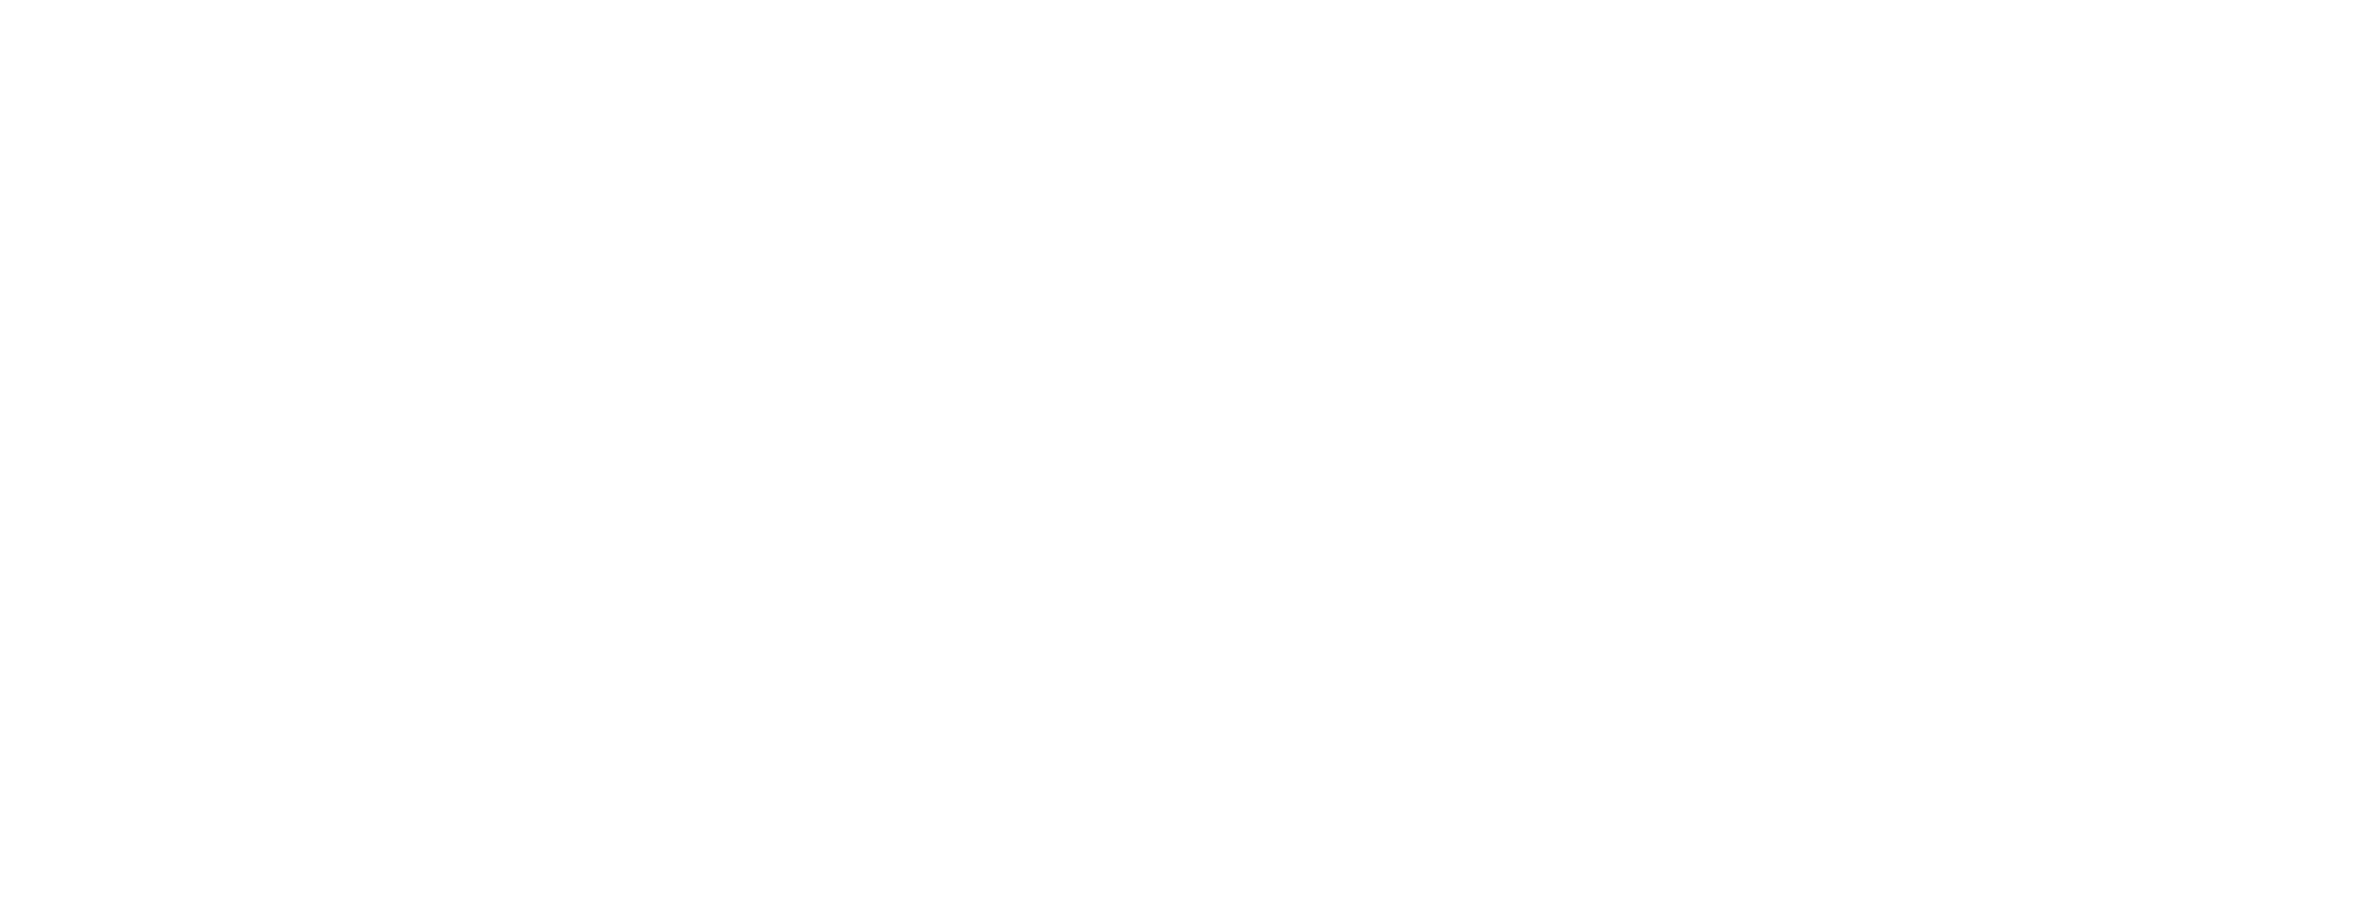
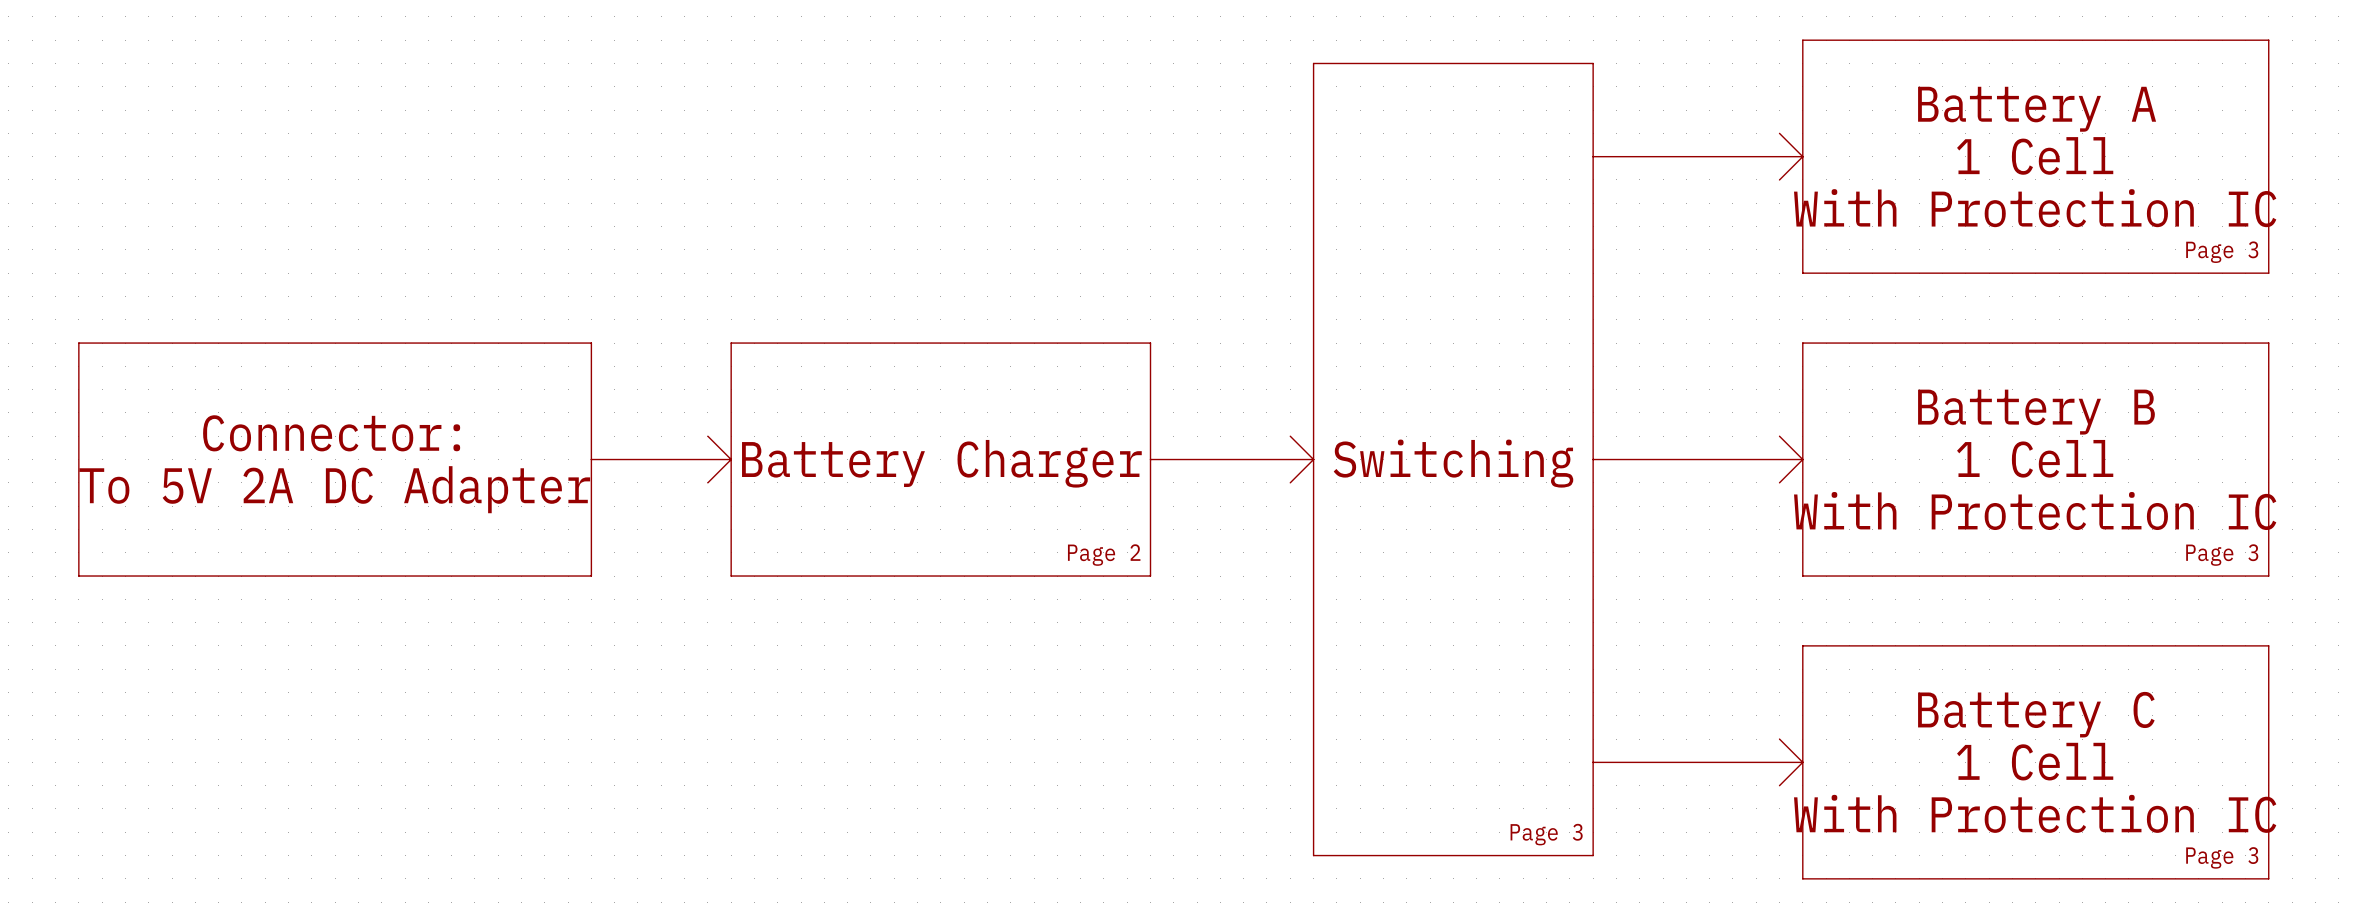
line: none -> (1802, 40) (2268, 40) (2268, 273) (1802, 273) (1802, 40)
line: none -> (1313, 63) (1313, 855) (1593, 855) (1593, 63) (1313, 63)
text: none -> Battery A (2037, 109)
line: none -> (1779, 133) (1802, 156)
line: none -> (1593, 156) (1802, 156)
line: none -> (1802, 156) (1779, 179)
text: none -> 1 Cell (2035, 155)
text: none -> With Protection IC (2035, 208)
text: none -> Page 3 (2222, 252)
line: none -> (78, 343) (78, 576) (591, 576) (591, 343) (78, 343)
line: none -> (731, 343) (1150, 343) (1150, 576) (731, 576) (731, 343)
line: none -> (1802, 343) (2268, 343) (2268, 576) (1802, 576) (1802, 343)
text: none -> Battery B (2036, 412)
text: none -> Connector: (331, 433)
line: none -> (707, 436) (731, 459)
line: none -> (1290, 436) (1313, 459)
line: none -> (1779, 436) (1802, 459)
line: none -> (591, 459) (731, 459)
line: none -> (731, 459) (707, 482)
line: none -> (1150, 459) (1313, 459)
line: none -> (1313, 459) (1290, 482)
line: none -> (1593, 459) (1802, 459)
line: none -> (1802, 459) (1779, 482)
text: none -> 1 Cell (2035, 458)
text: none -> Battery Charger (941, 463)
text: none -> Switching (1453, 463)
text: none -> To 5V 2A DC Adapter (334, 489)
text: none -> With Protection IC (2035, 510)
text: none -> Page 2 (1104, 555)
text: none -> Page 3 (2222, 555)
line: none -> (1802, 645) (1802, 878) (2268, 878) (2268, 645) (1802, 645)
text: none -> Battery C (2036, 714)
line: none -> (1779, 739) (1802, 762)
line: none -> (1593, 762) (1802, 762)
line: none -> (1802, 762) (1779, 785)
text: none -> 1 Cell (2035, 761)
text: none -> With Protection IC (2035, 813)
text: none -> Page 3 (1546, 834)
text: none -> Page 3 (2222, 857)

